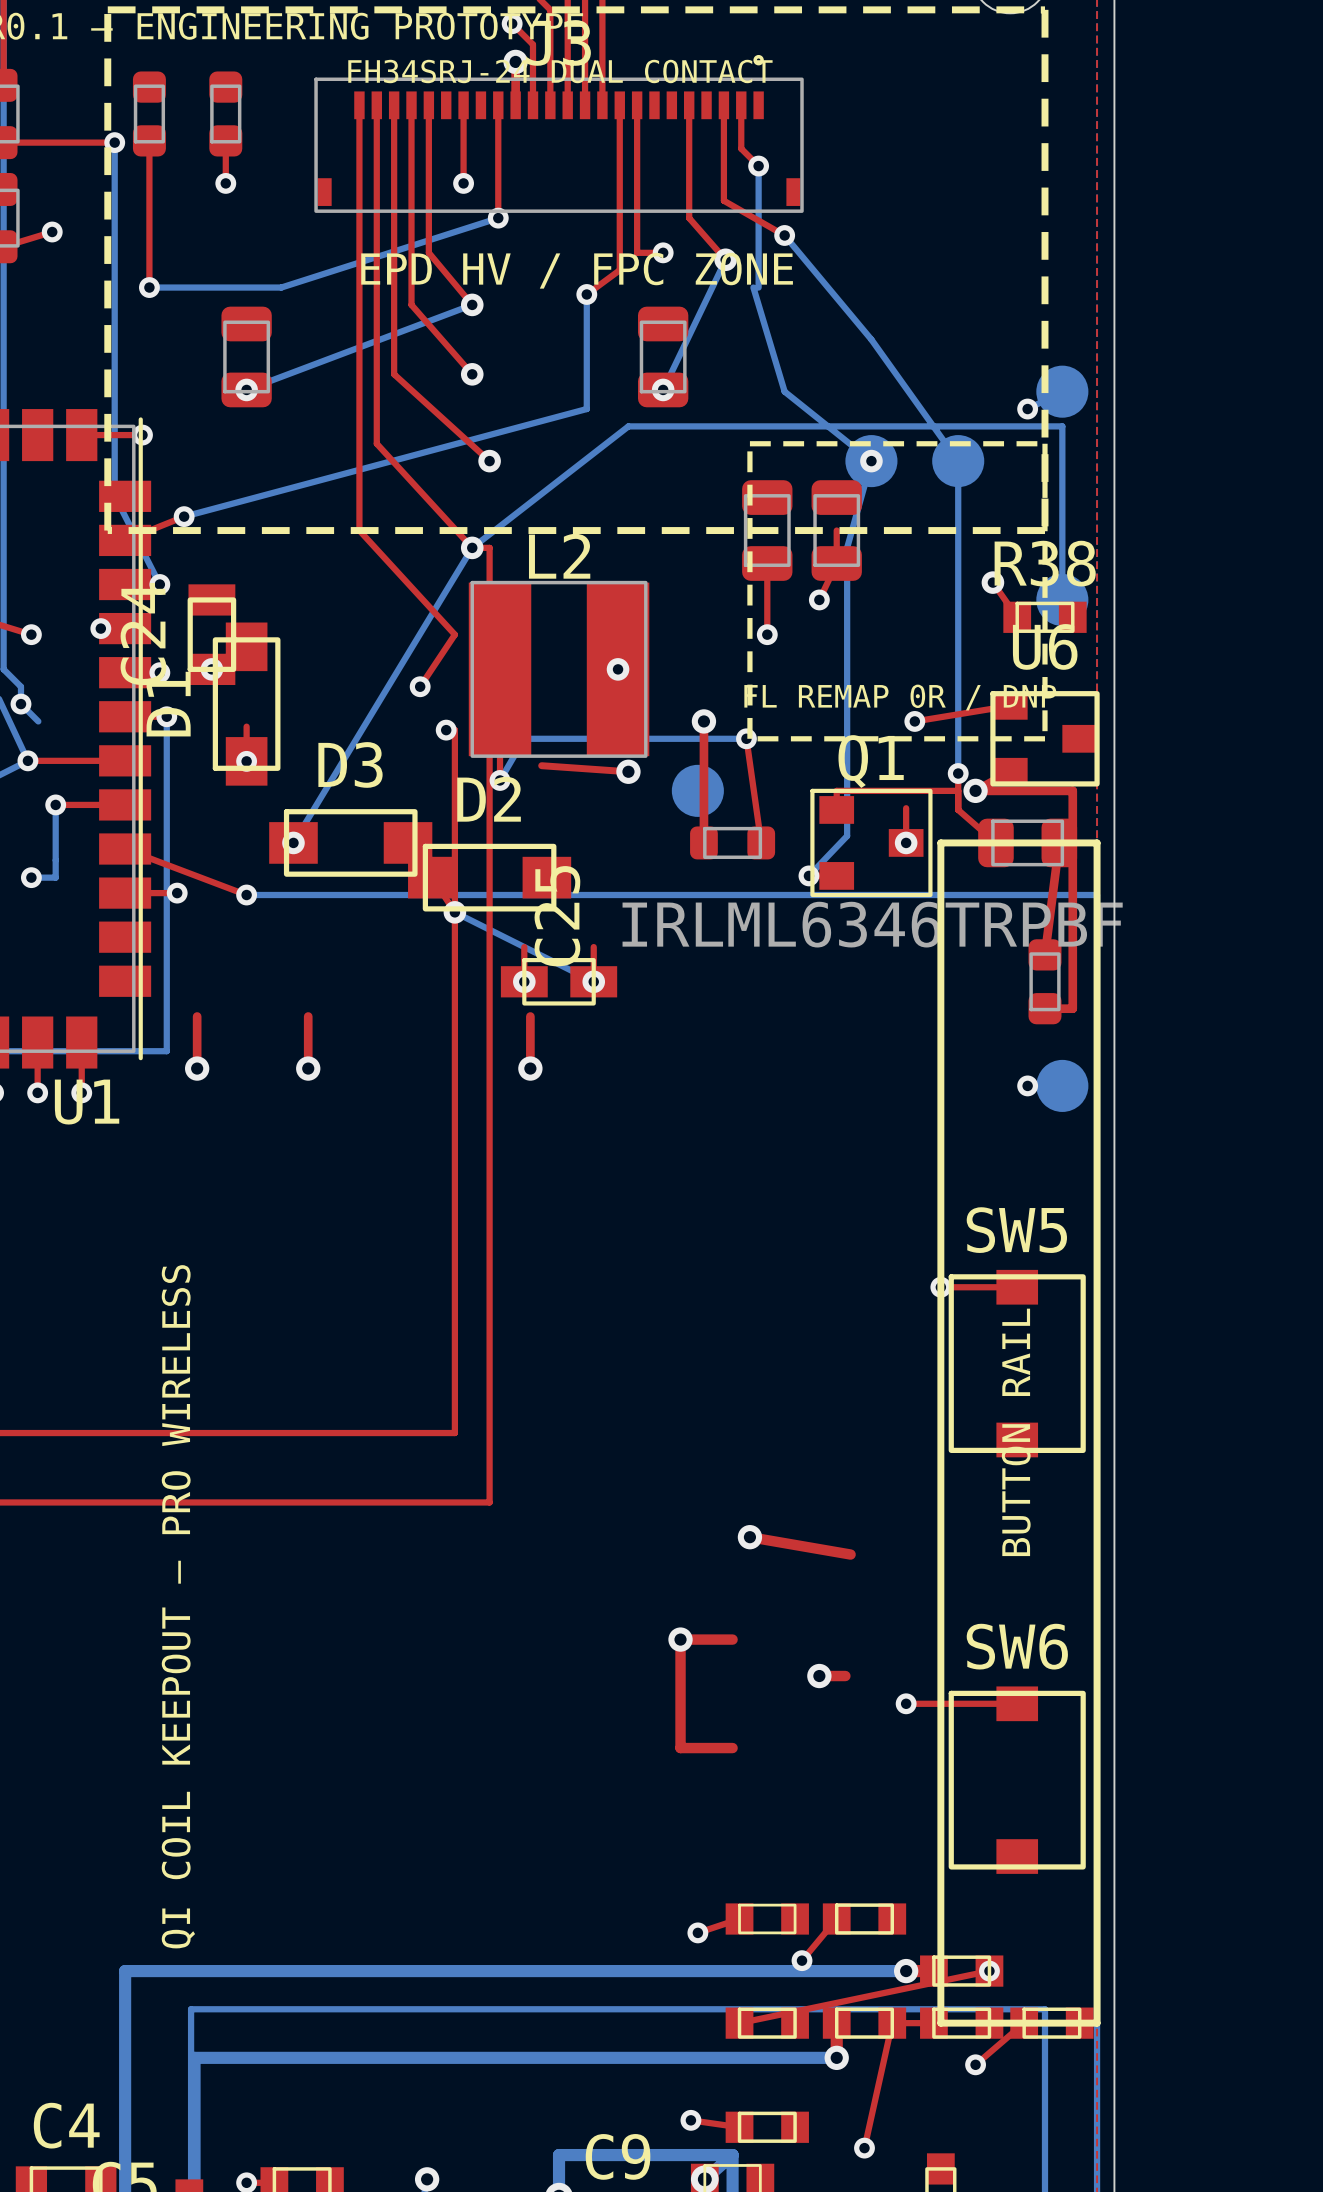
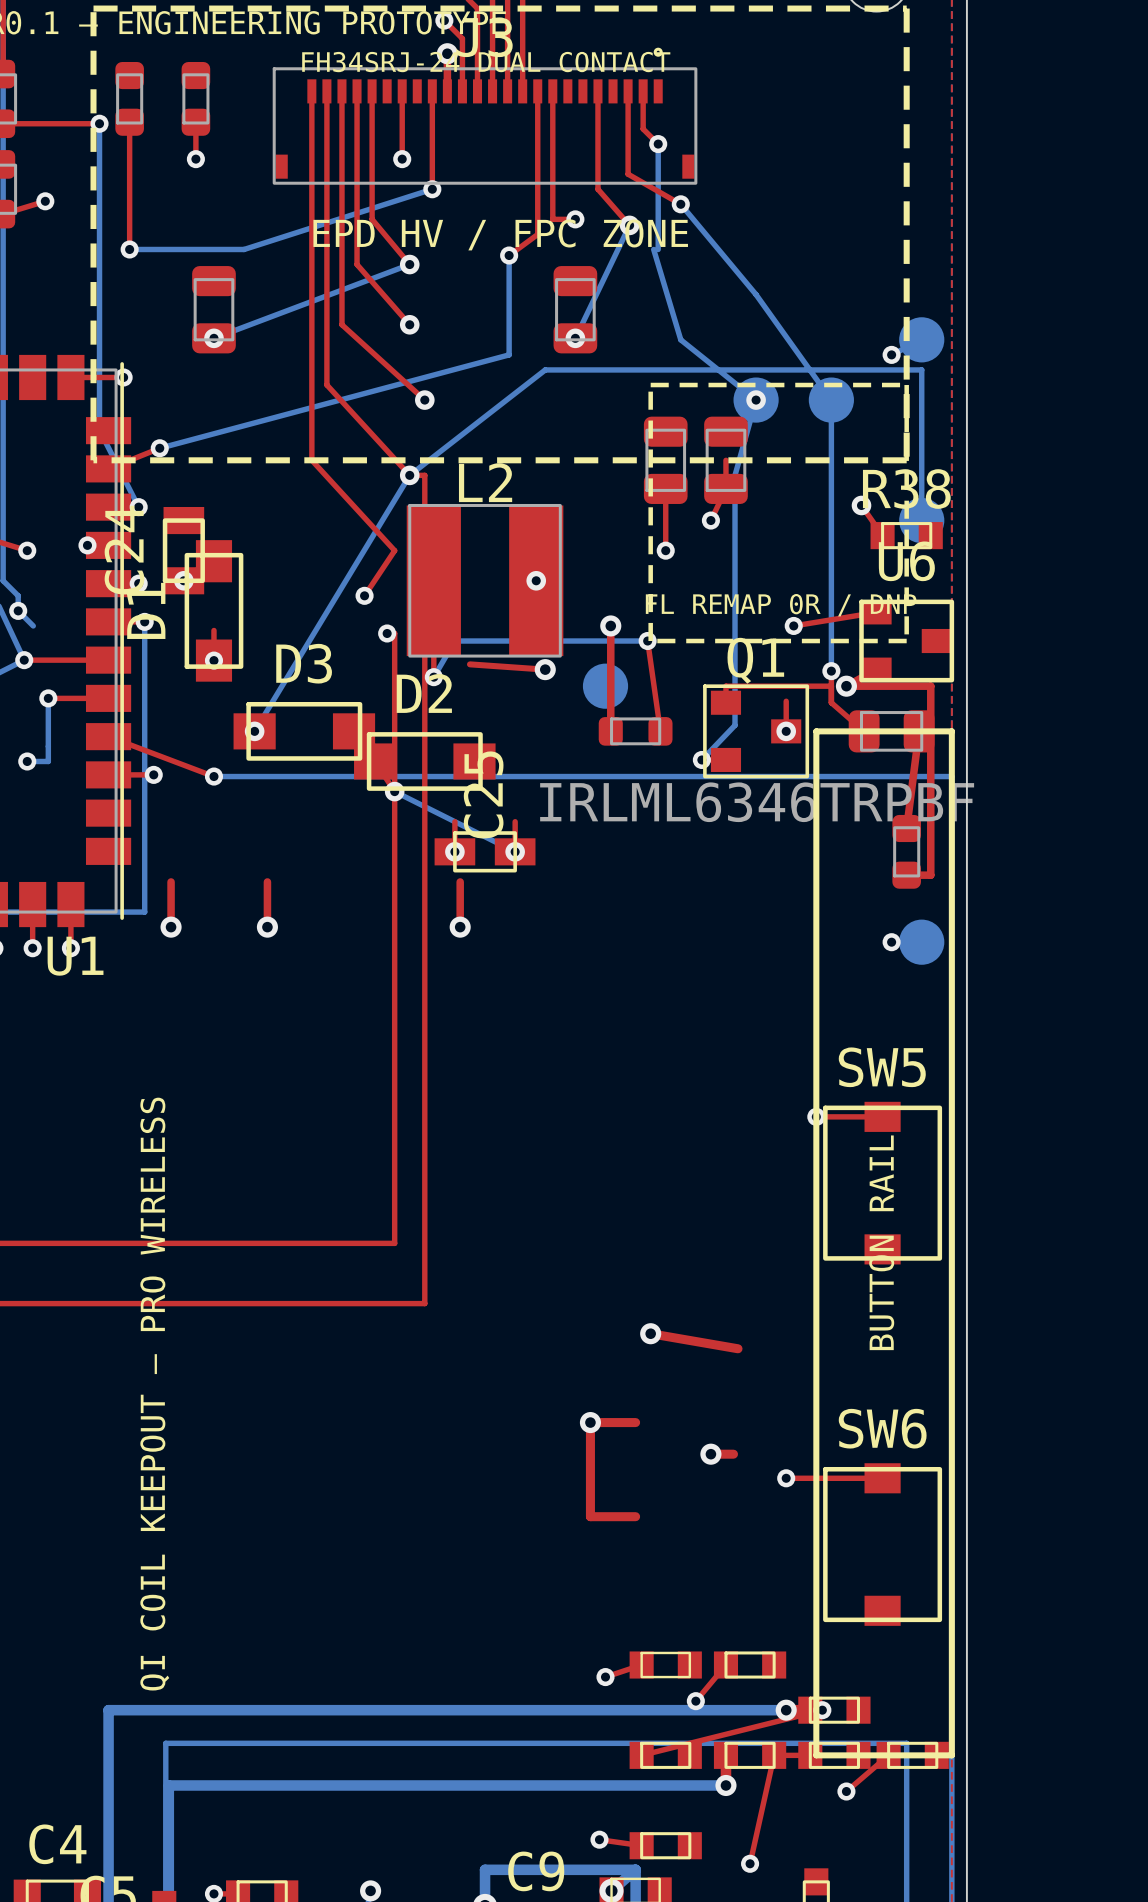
top track: (989, 1971) (739, 2023) -> (822, 1710) (641, 1755)
via position: (989, 1971) -> (822, 1710)

